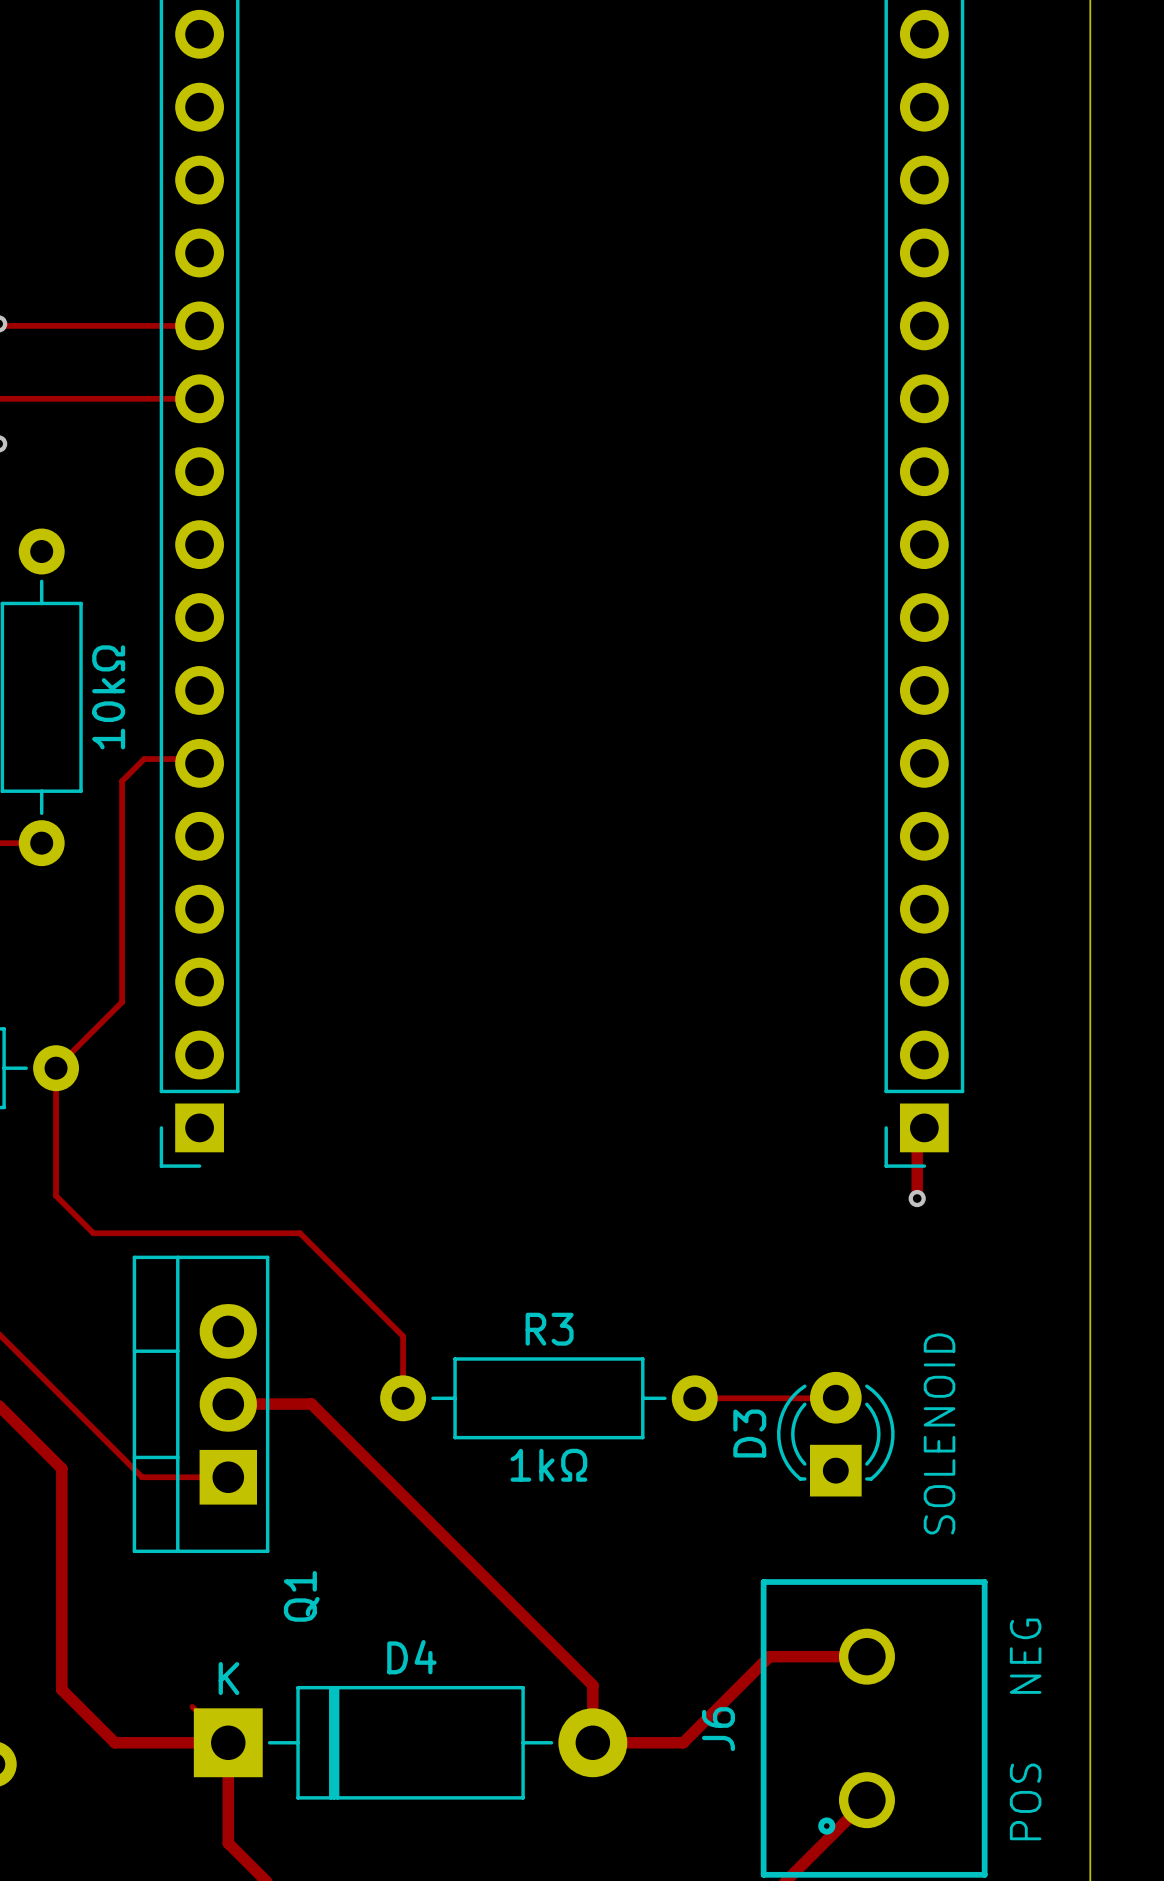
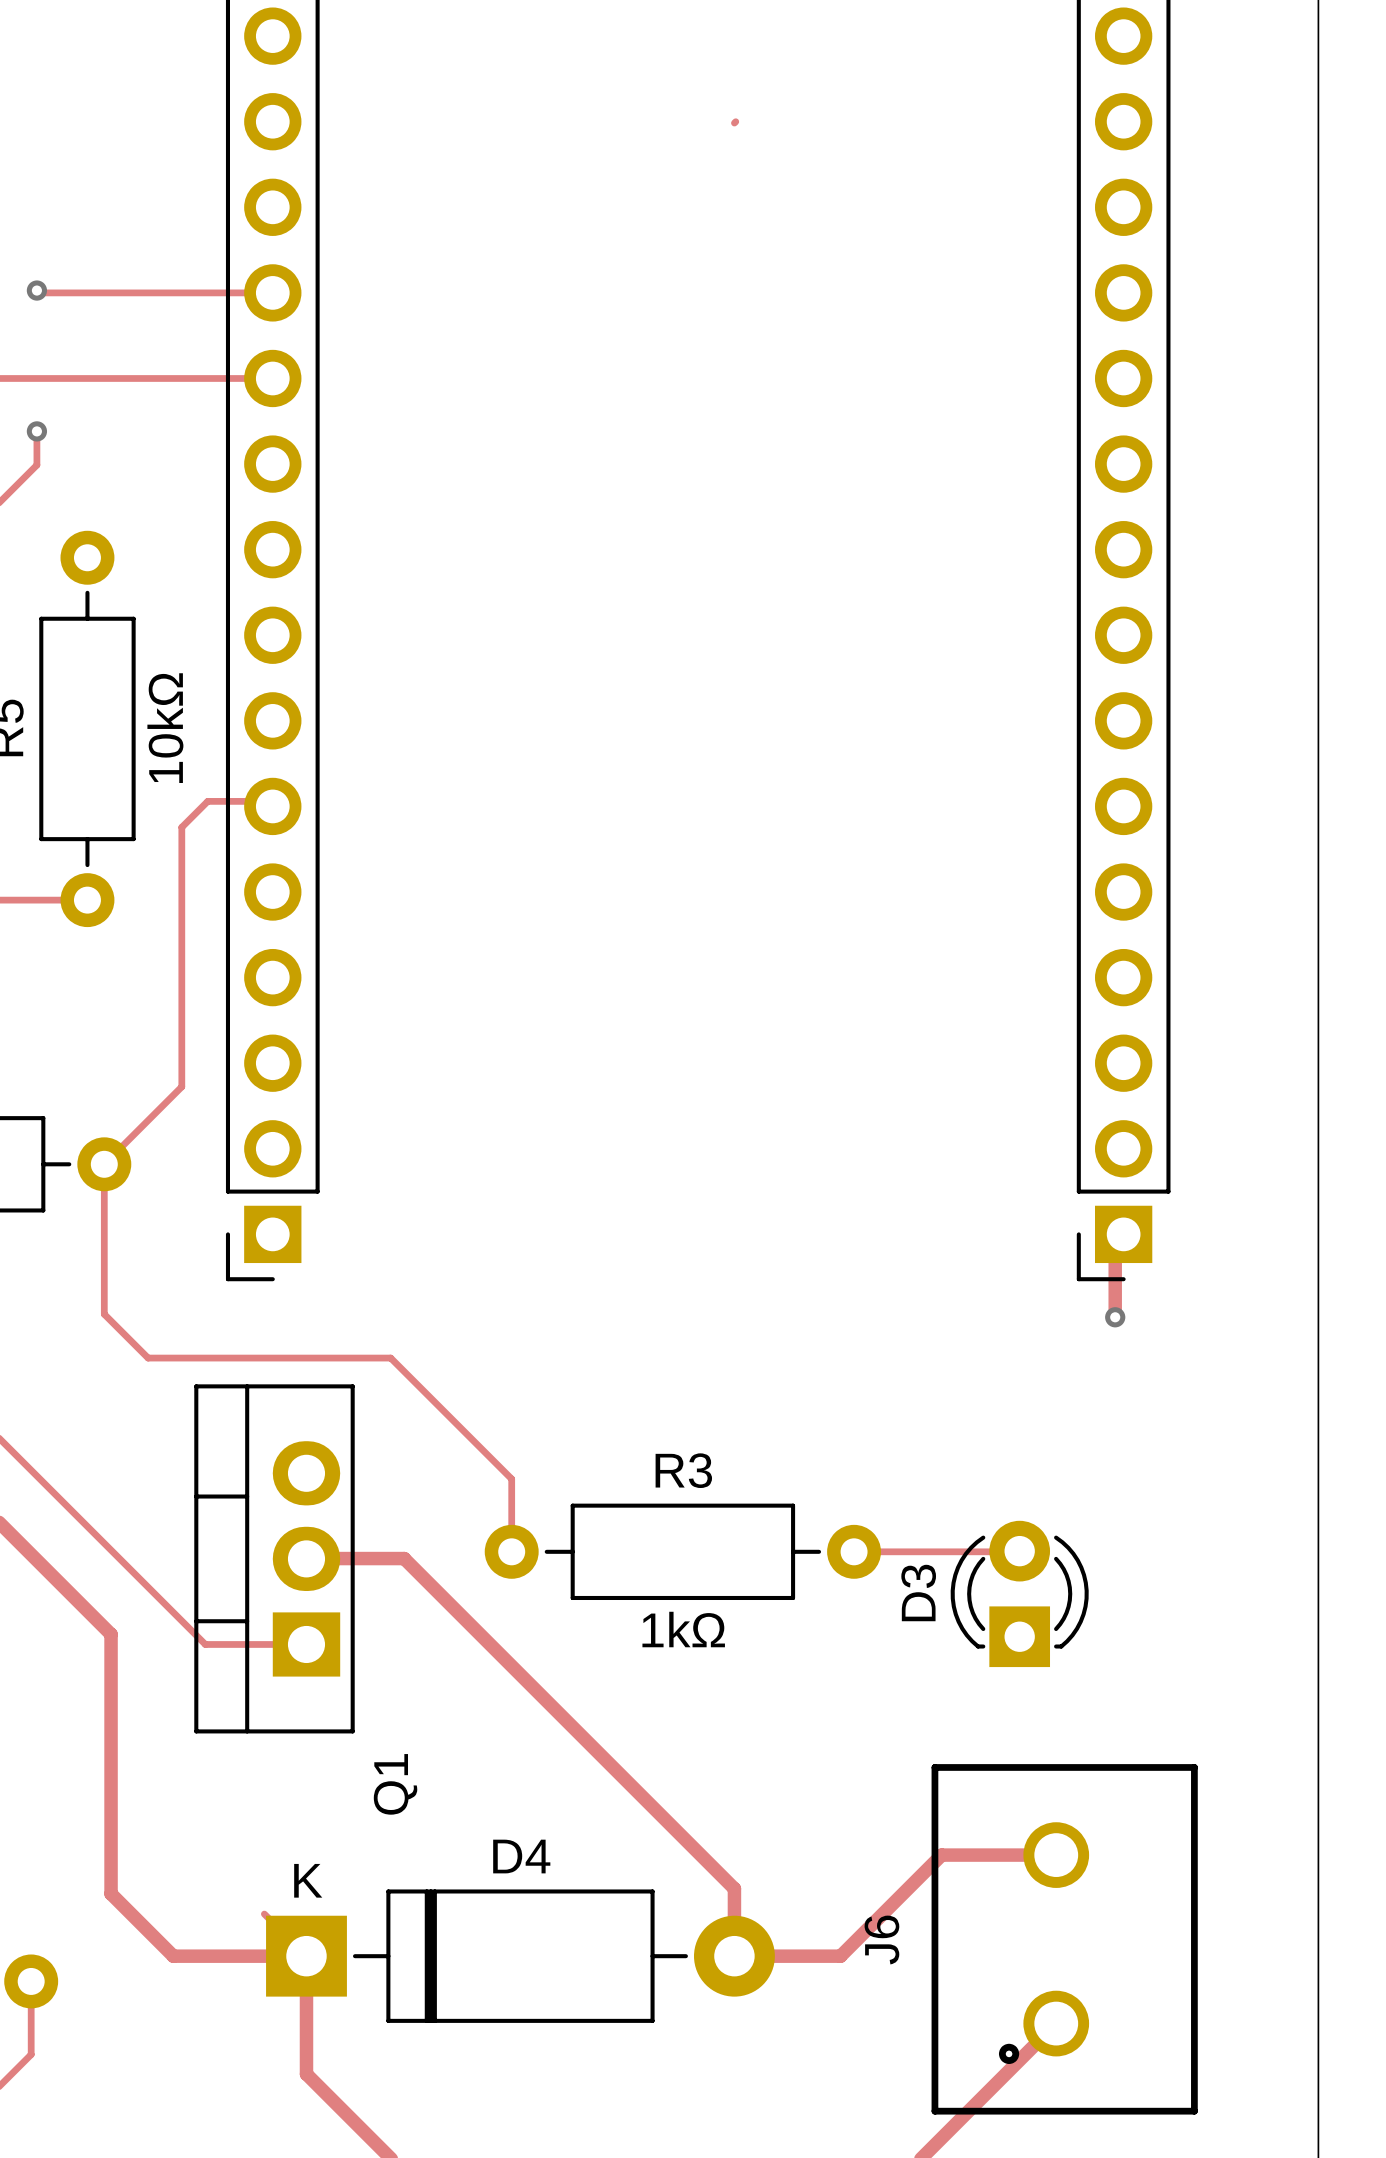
track: none -> (735, 121) (734, 123)
text: SOLENOID (939, 1433) -> none
text: NEG (1025, 1656) -> none
text: POS (1025, 1801) -> none

